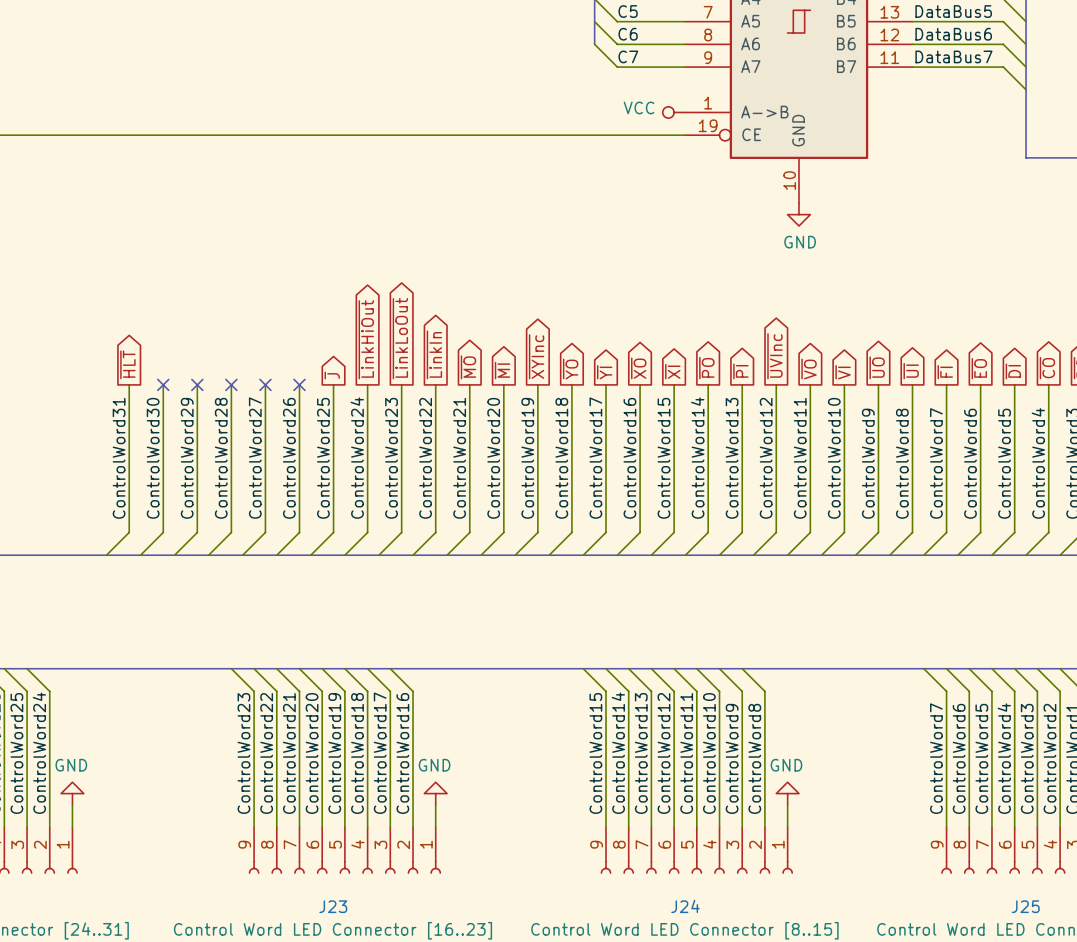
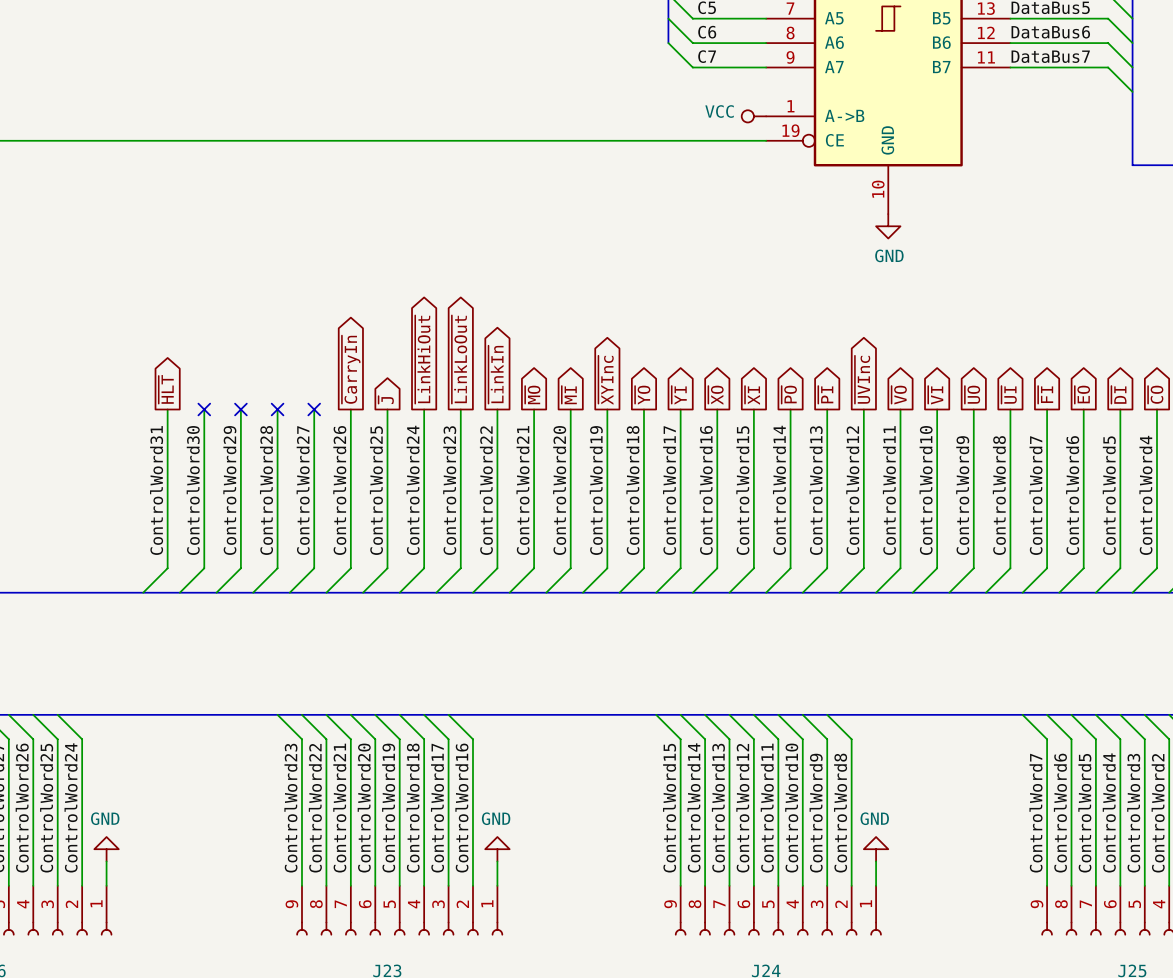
global label: none -> ~{CarryIn} (351, 369)
no-connect mark: (299, 384) -> none

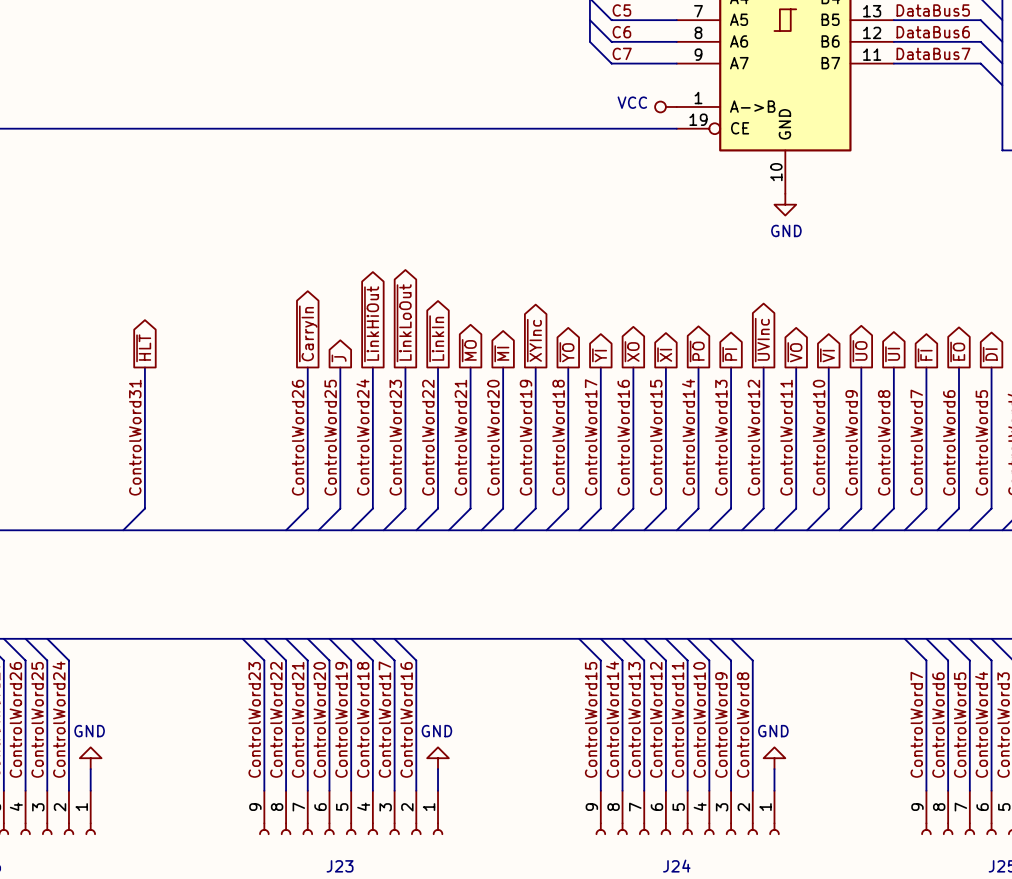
wire: (204, 409) (204, 568) (179, 592) -> none
no-connect mark: (204, 409) -> none
wire: (240, 409) (240, 568) (216, 592) -> none
no-connect mark: (240, 409) -> none
wire: (277, 409) (277, 568) (253, 592) -> none
no-connect mark: (277, 409) -> none
wire: (314, 409) (314, 568) (289, 592) -> none
no-connect mark: (314, 409) -> none
label: ControlWord30 (193, 490) -> none
label: ControlWord29 (229, 490) -> none
label: ControlWord28 (266, 490) -> none
label: ControlWord27 (303, 490) -> none

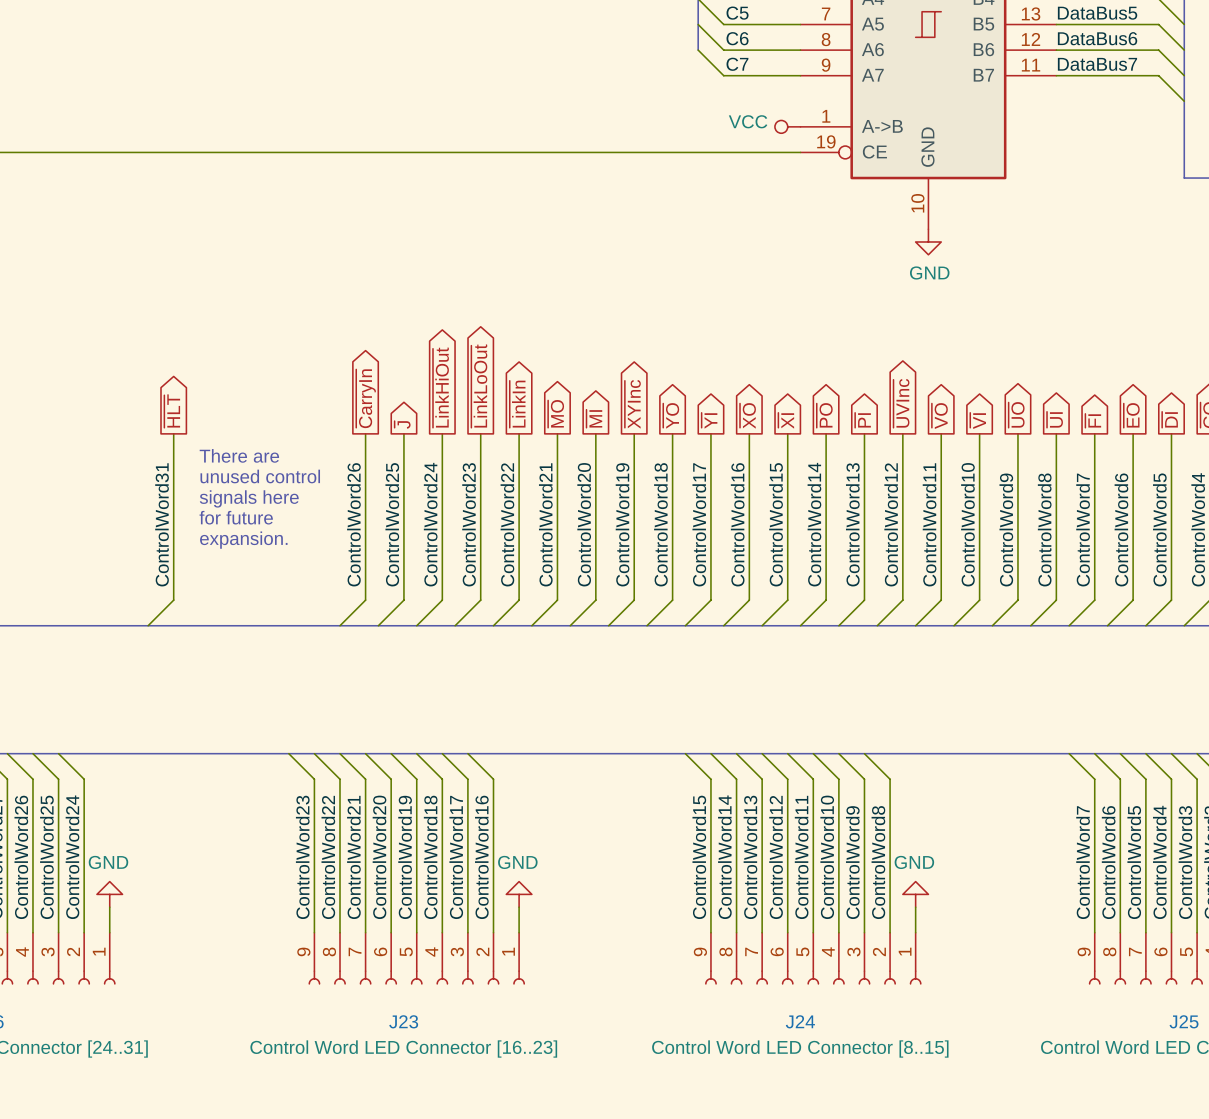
text: none -> There are (239, 455)
text: none -> unused control (260, 476)
text: none -> signals here (249, 498)
text: none -> for future (236, 517)
text: none -> expansion. (243, 540)

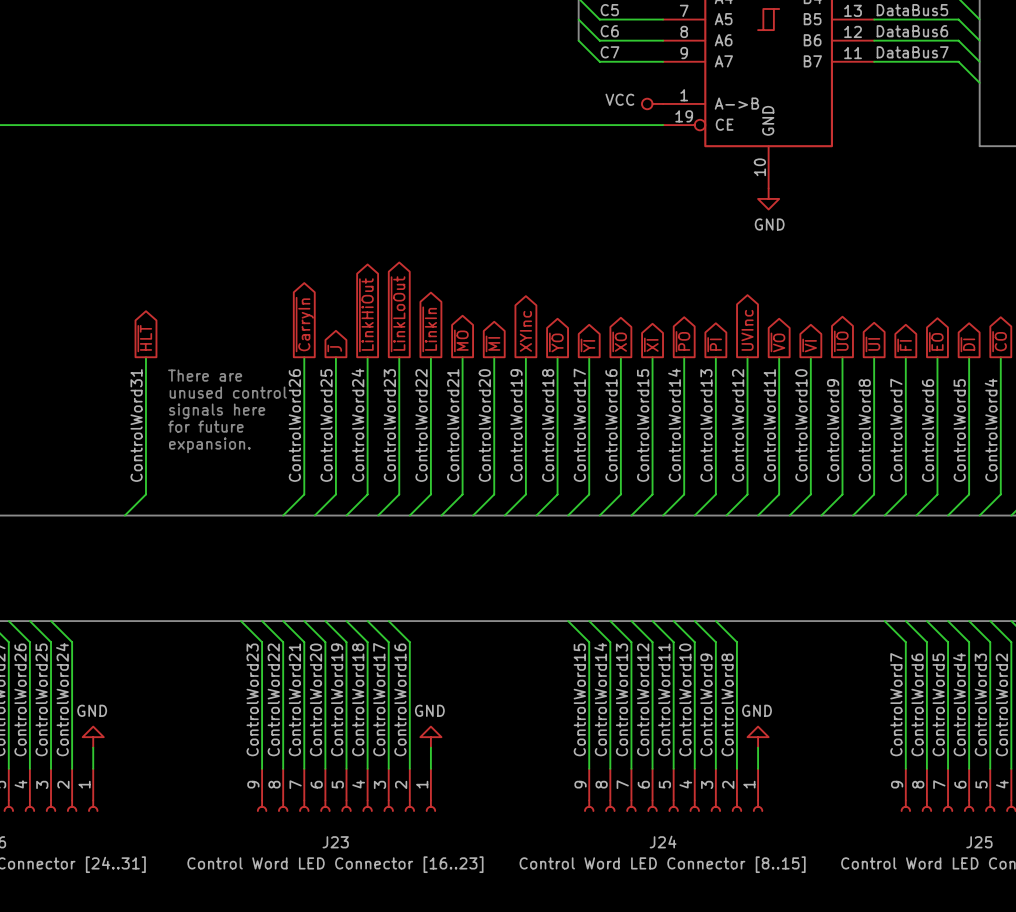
global label: ~{UVInc} (901, 403) -> UVInc (747, 330)
global label: ~{XYInc} (632, 404) -> XYInc (525, 331)

